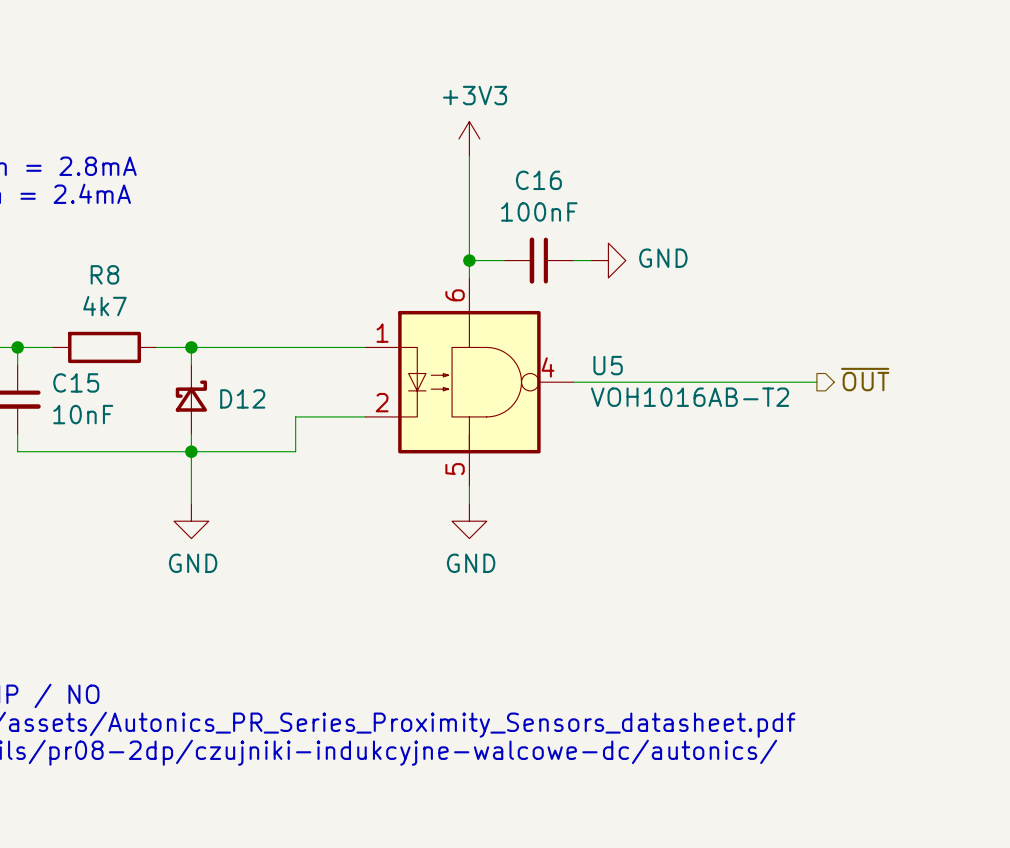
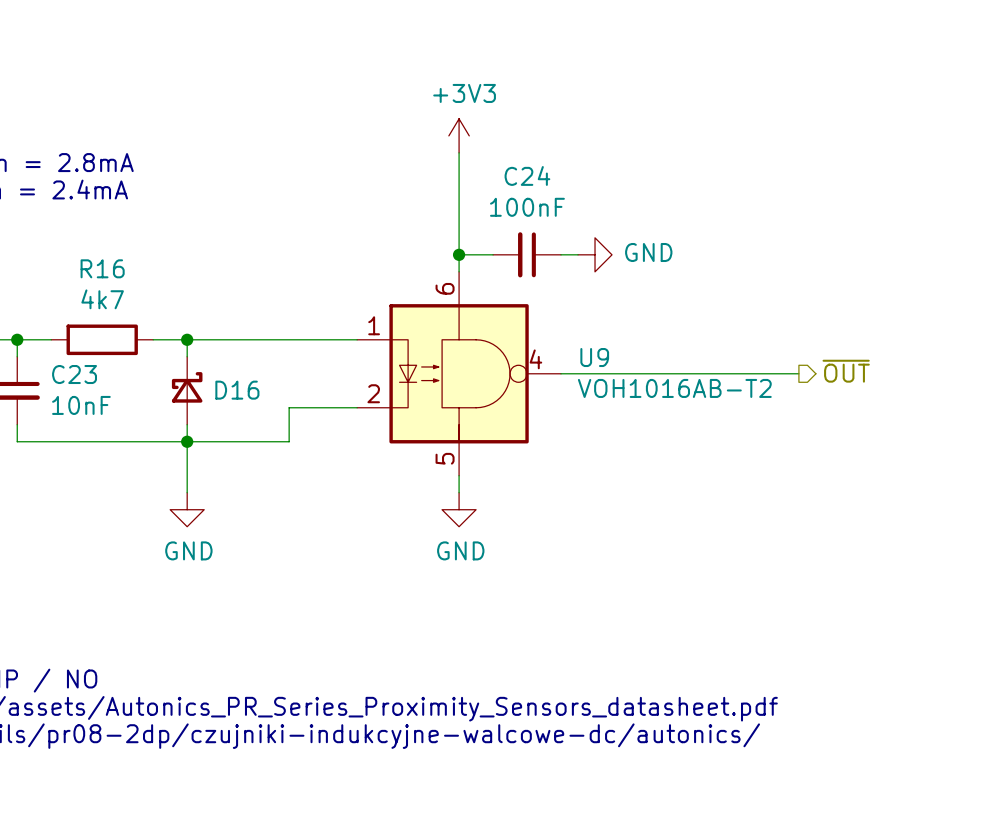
C16 name: C16 (538, 180) -> C24 (527, 175)
R8 name: R8 (104, 274) -> R16 (102, 268)
U5 name: U5 (608, 365) -> U9 (594, 357)
C15 name: C15 (76, 382) -> C23 (74, 374)
D12 name: D12 (242, 398) -> D16 (237, 390)

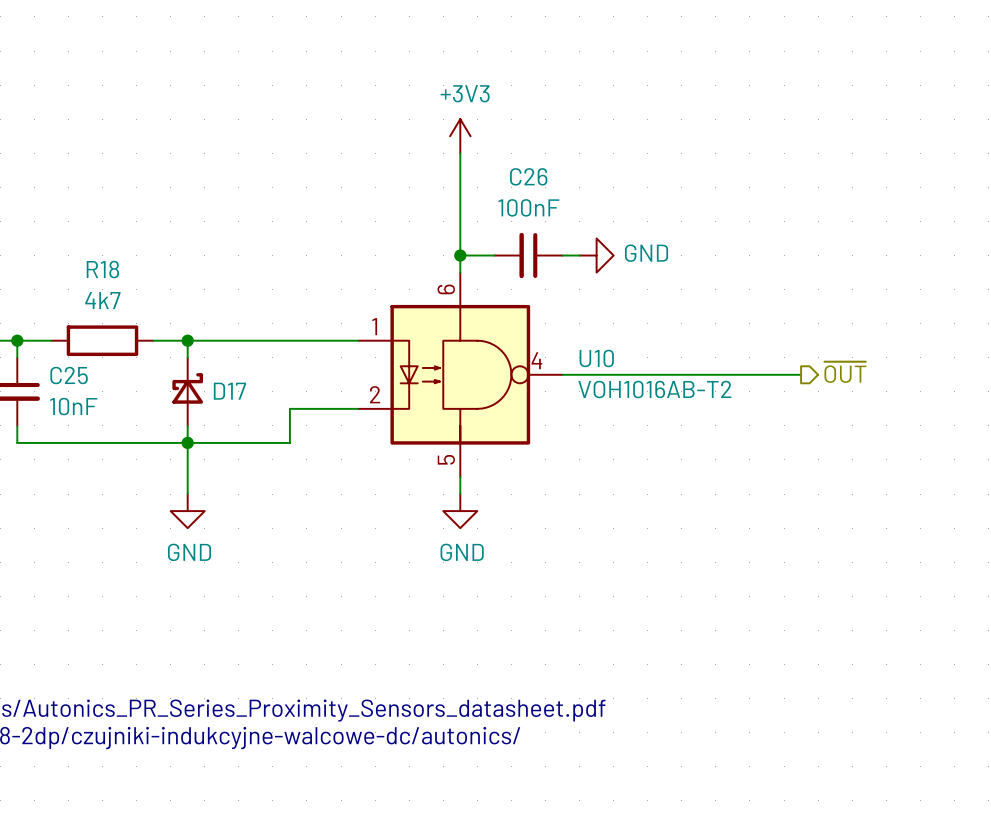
C24 name: C24 (527, 175) -> C26 (528, 176)
R16 name: R16 (102, 268) -> R18 (102, 269)
U9 name: U9 (594, 357) -> U10 (596, 358)
C23 name: C23 (74, 374) -> C25 (69, 375)
D16 name: D16 (237, 390) -> D17 (229, 391)

